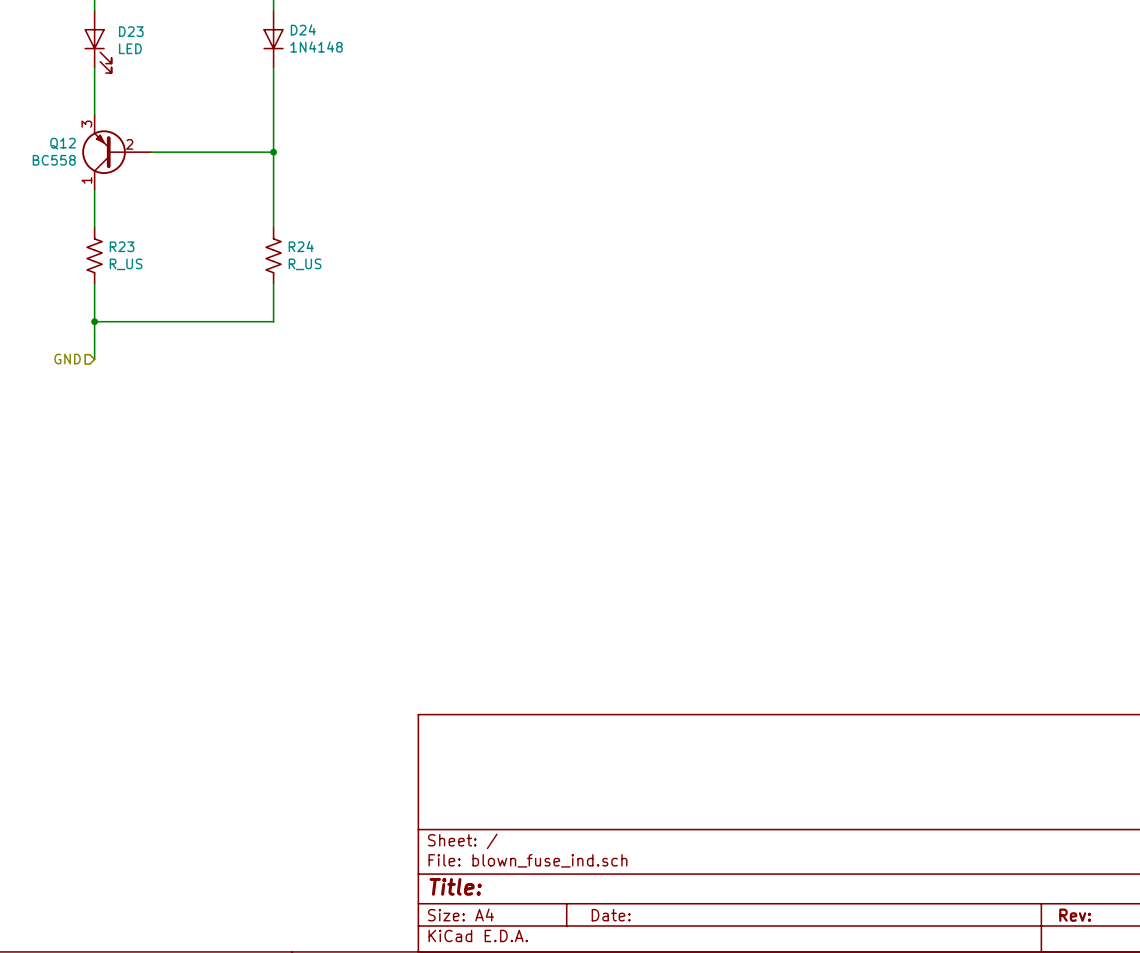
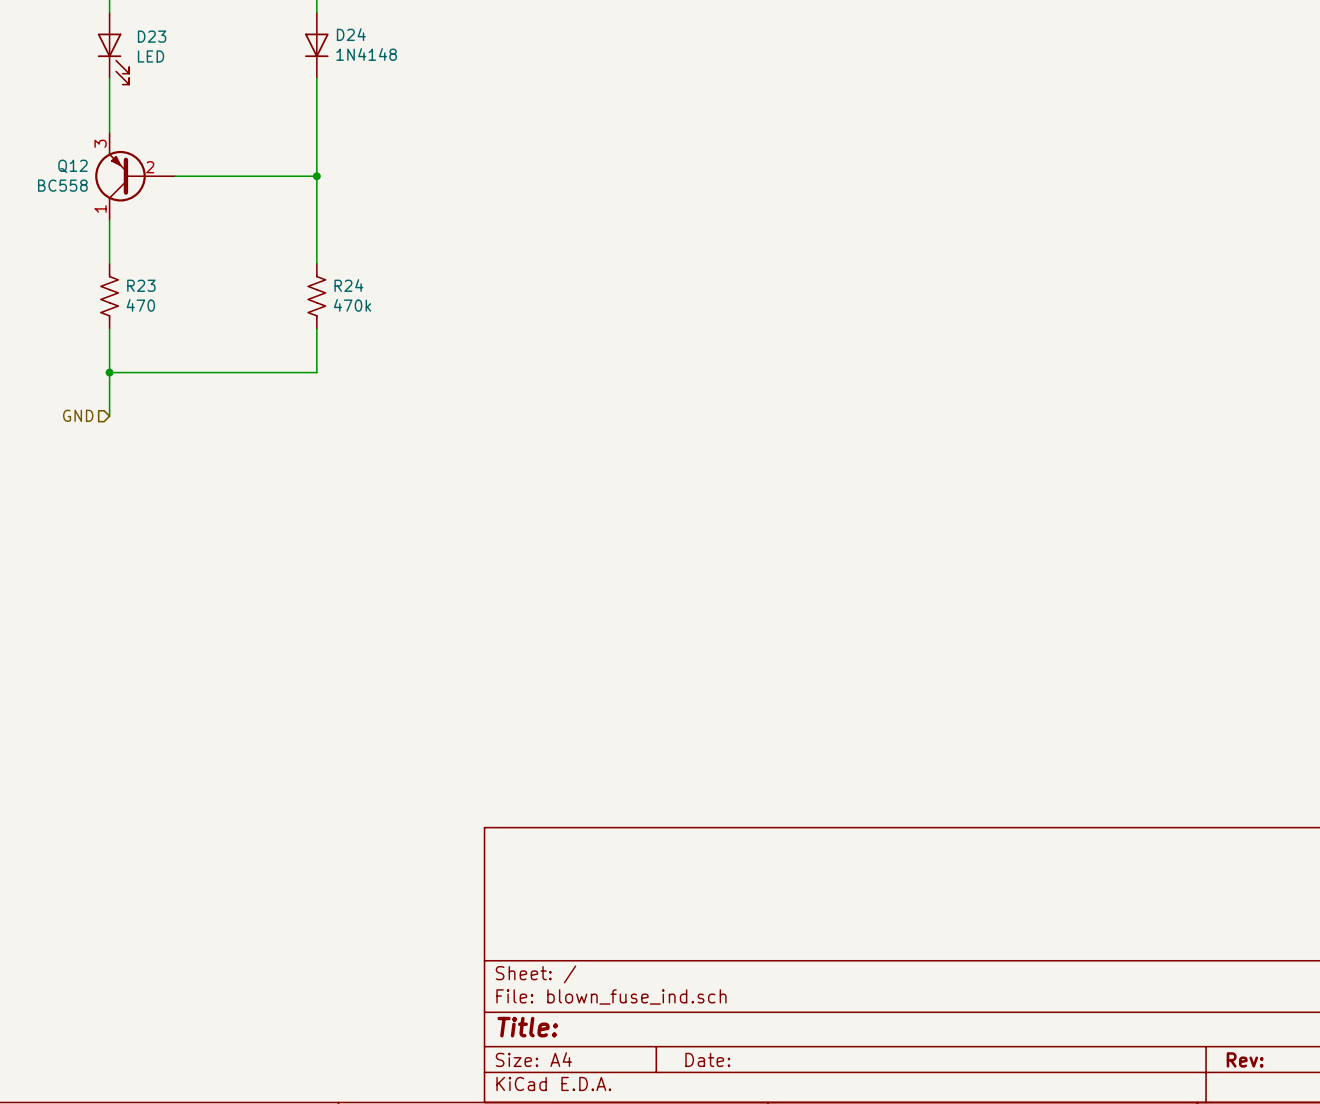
R23 value: R_US (126, 264) -> 470 (140, 305)
R24 value: R_US (305, 264) -> 470k (352, 305)

